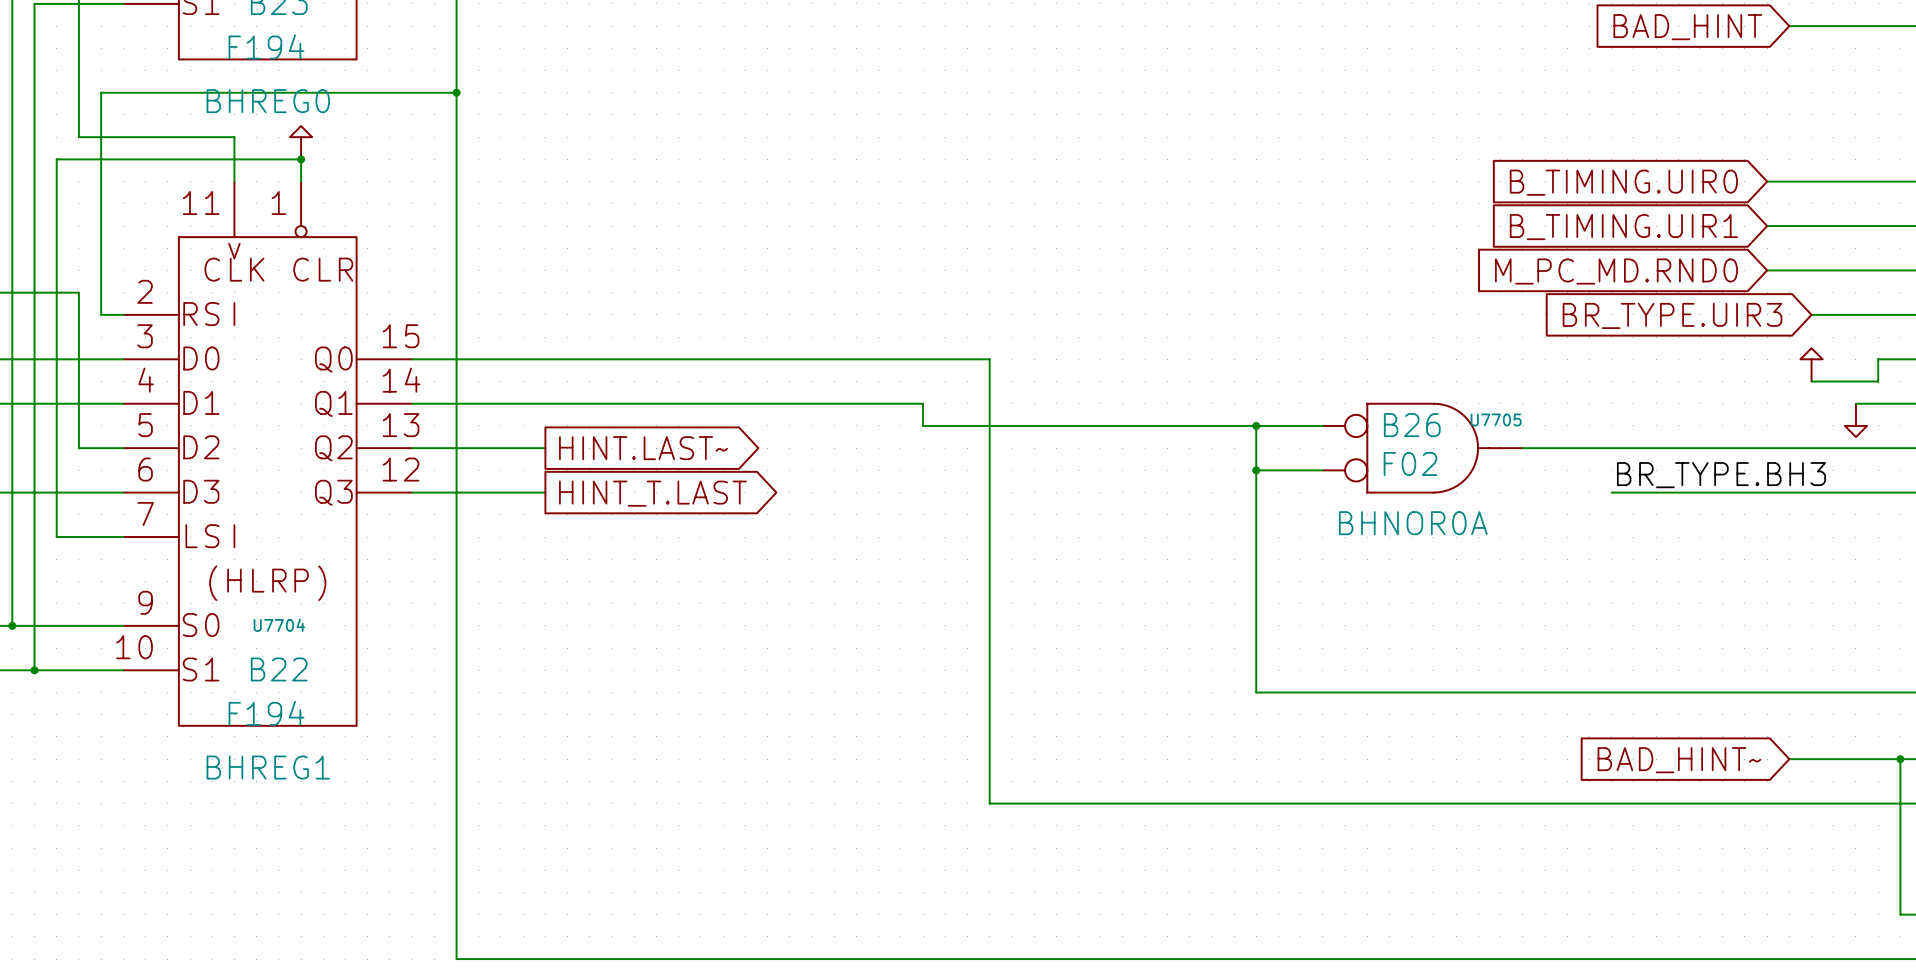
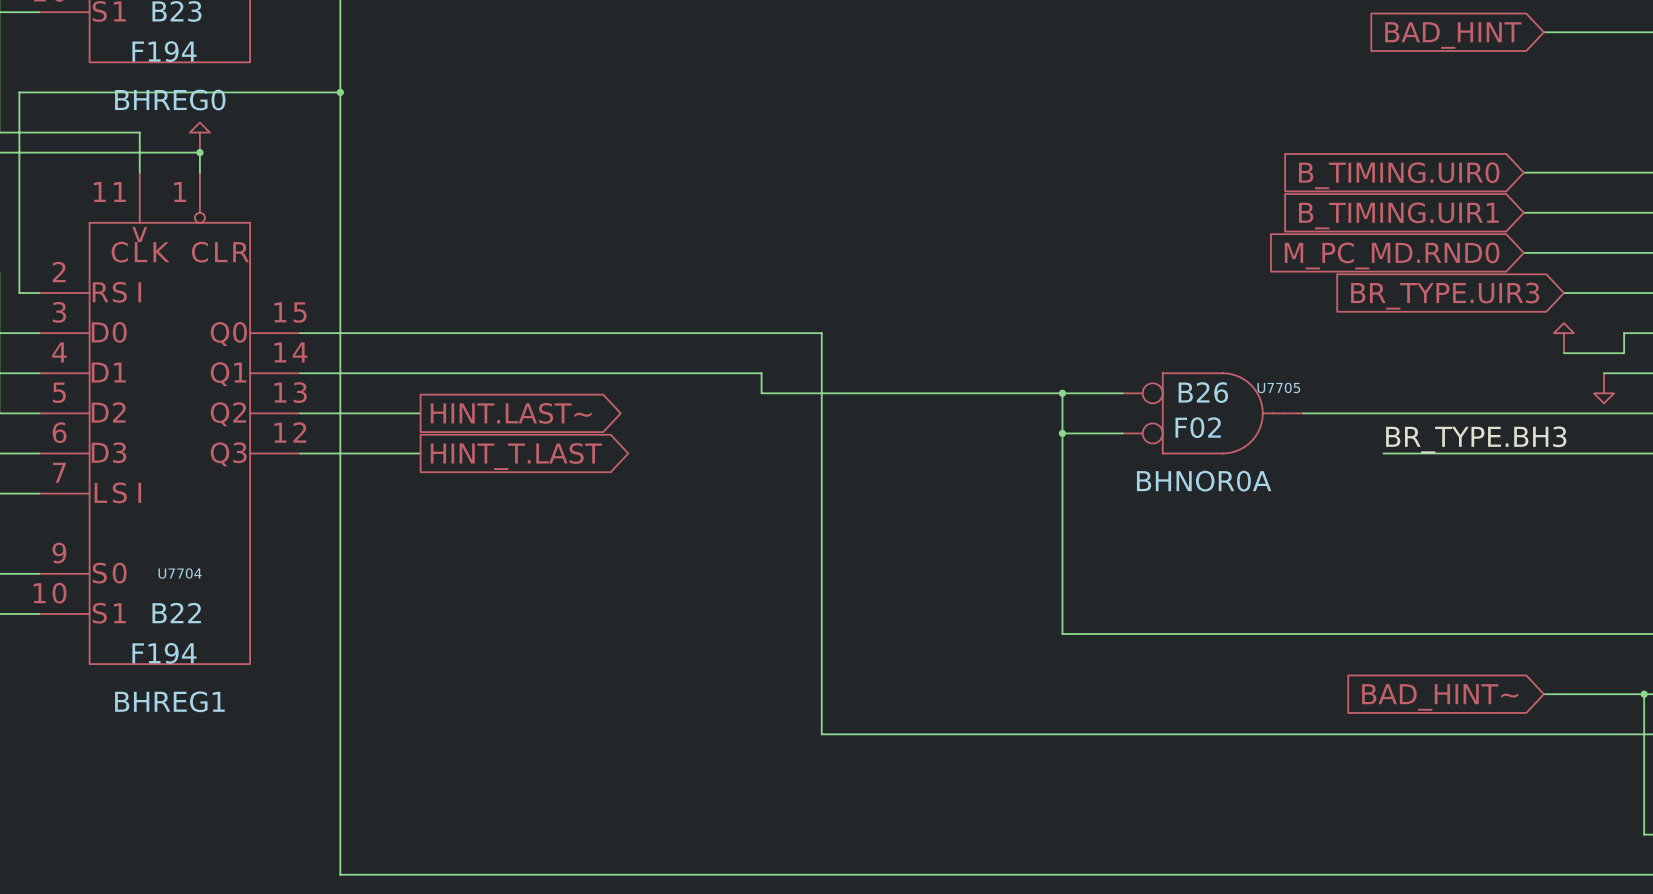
U7704 text: H (234, 580) -> none
U7704 text: L (258, 580) -> none
U7704 text: R (279, 580) -> none
U7704 text: P (301, 580) -> none
U7704 text: ( (213, 583) -> none
U7704 text: ) (322, 583) -> none

